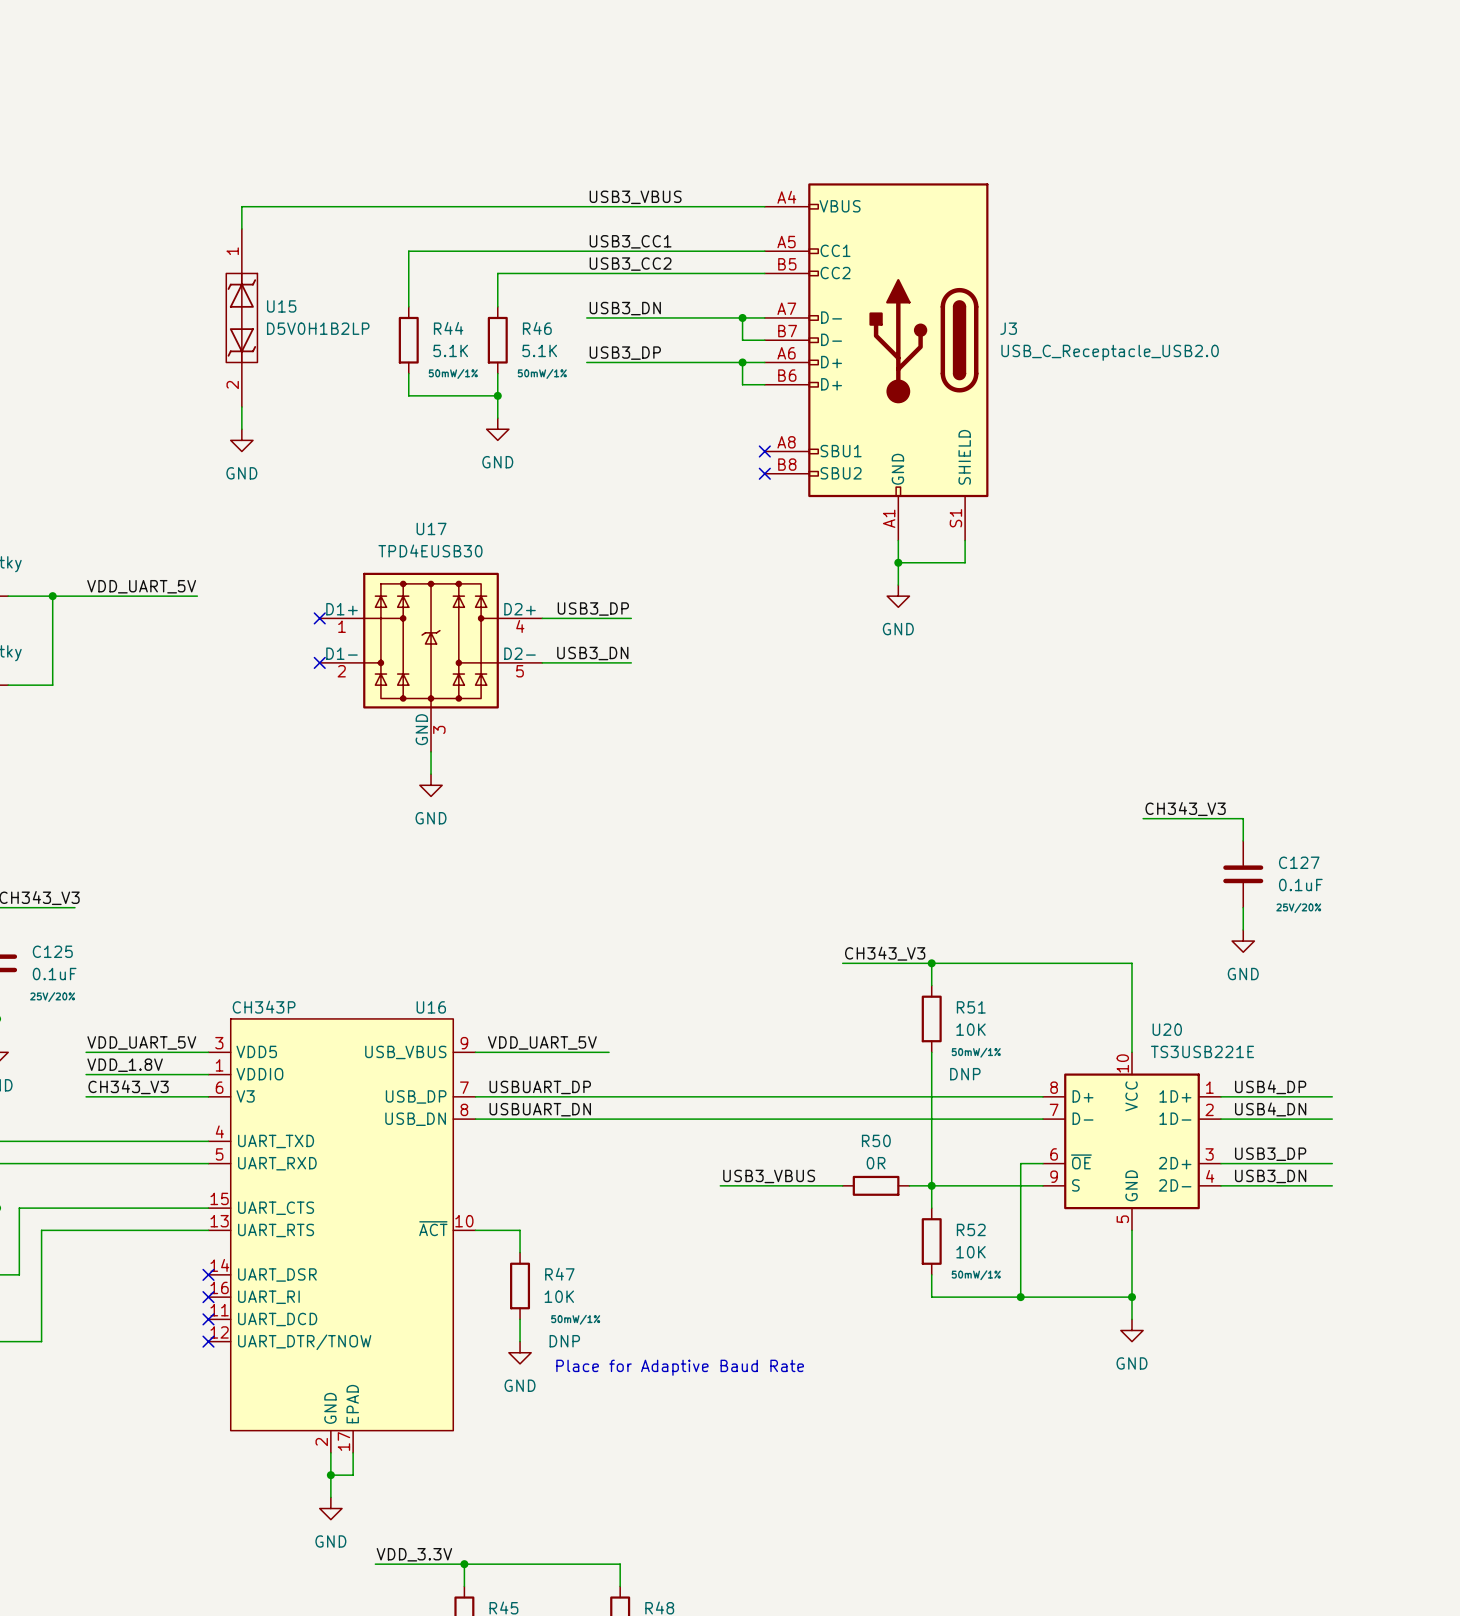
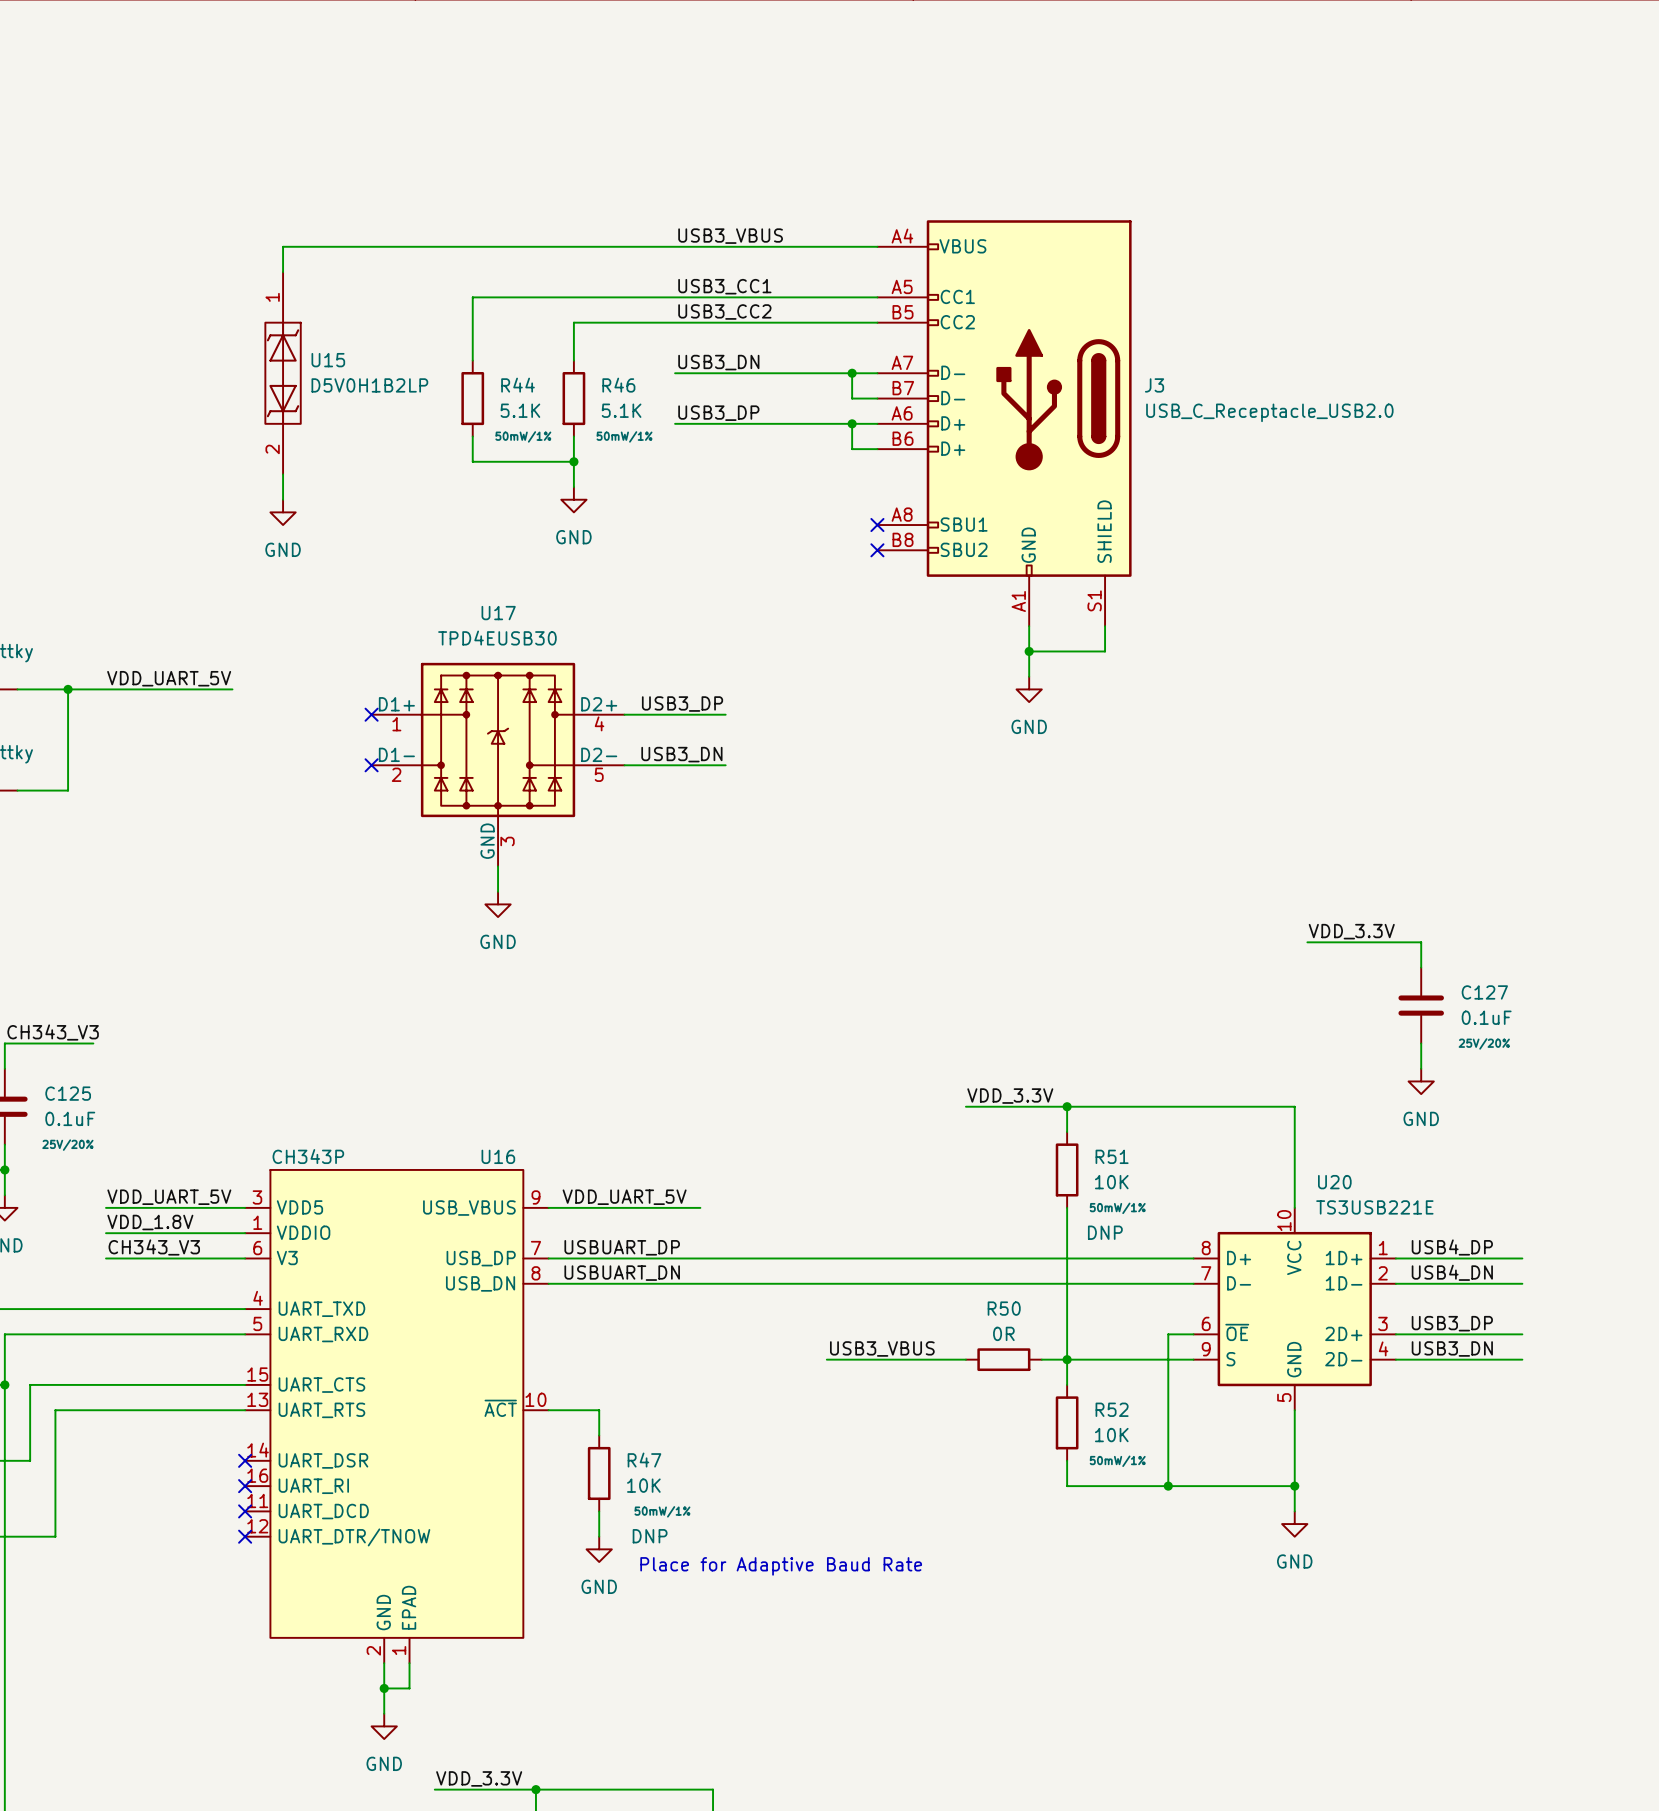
label: CH343_V3 (1185, 809) -> VDD_3.3V (1351, 931)
label: CH343_V3 (885, 953) -> VDD_3.3V (1010, 1096)
U16 pin number: 17 (343, 1441) -> 1 (399, 1650)

